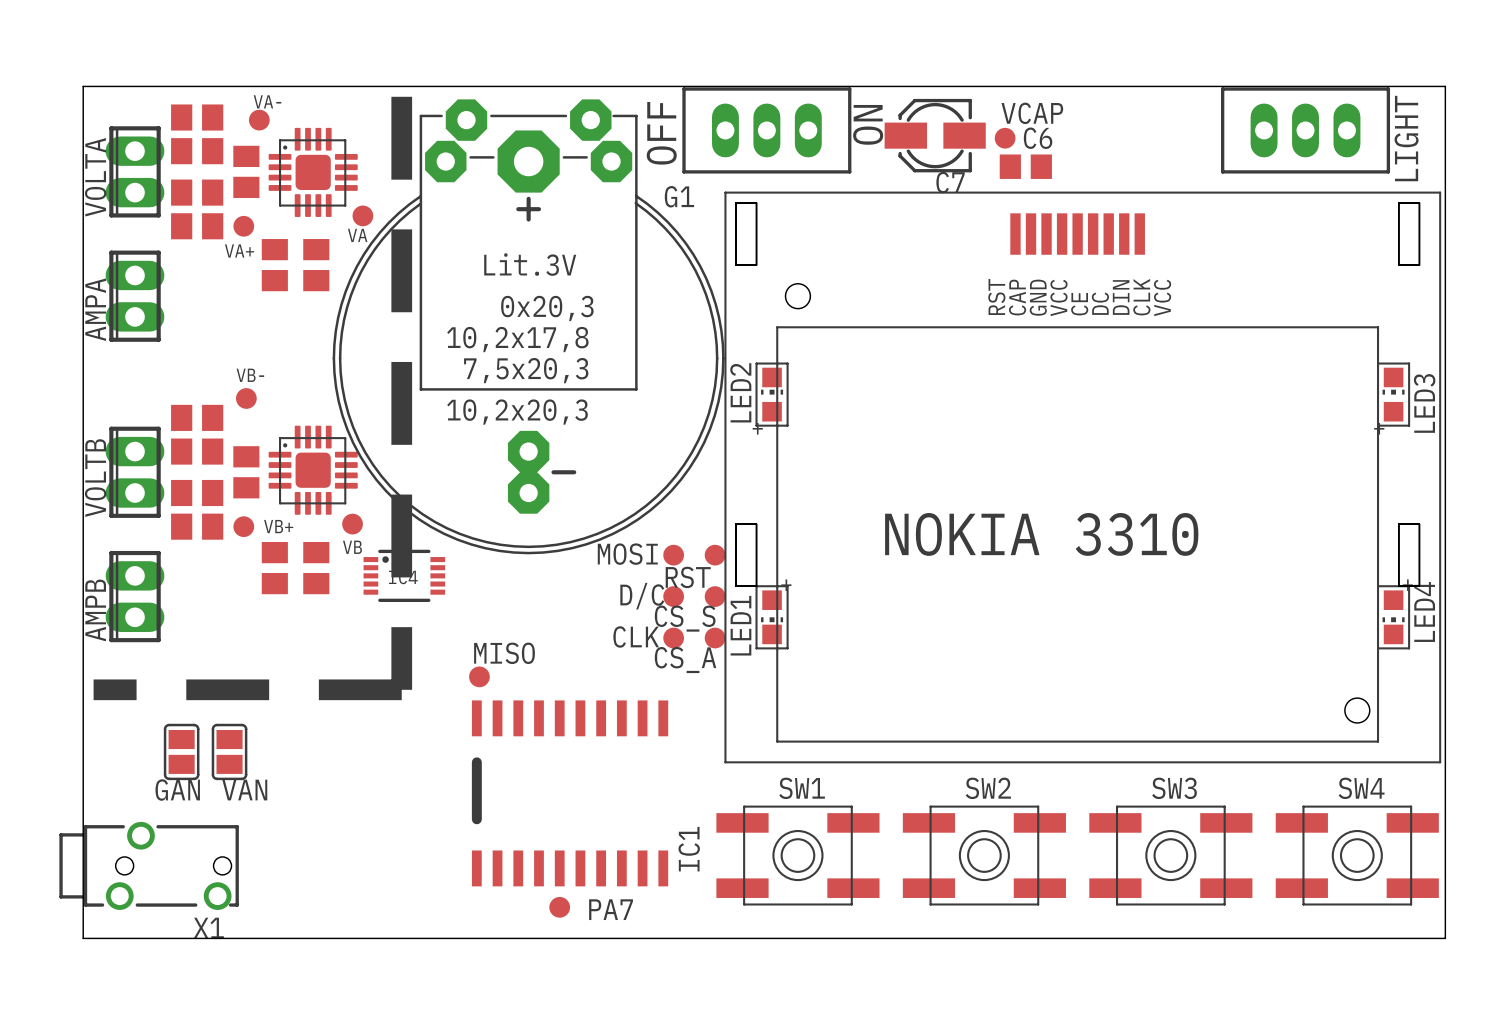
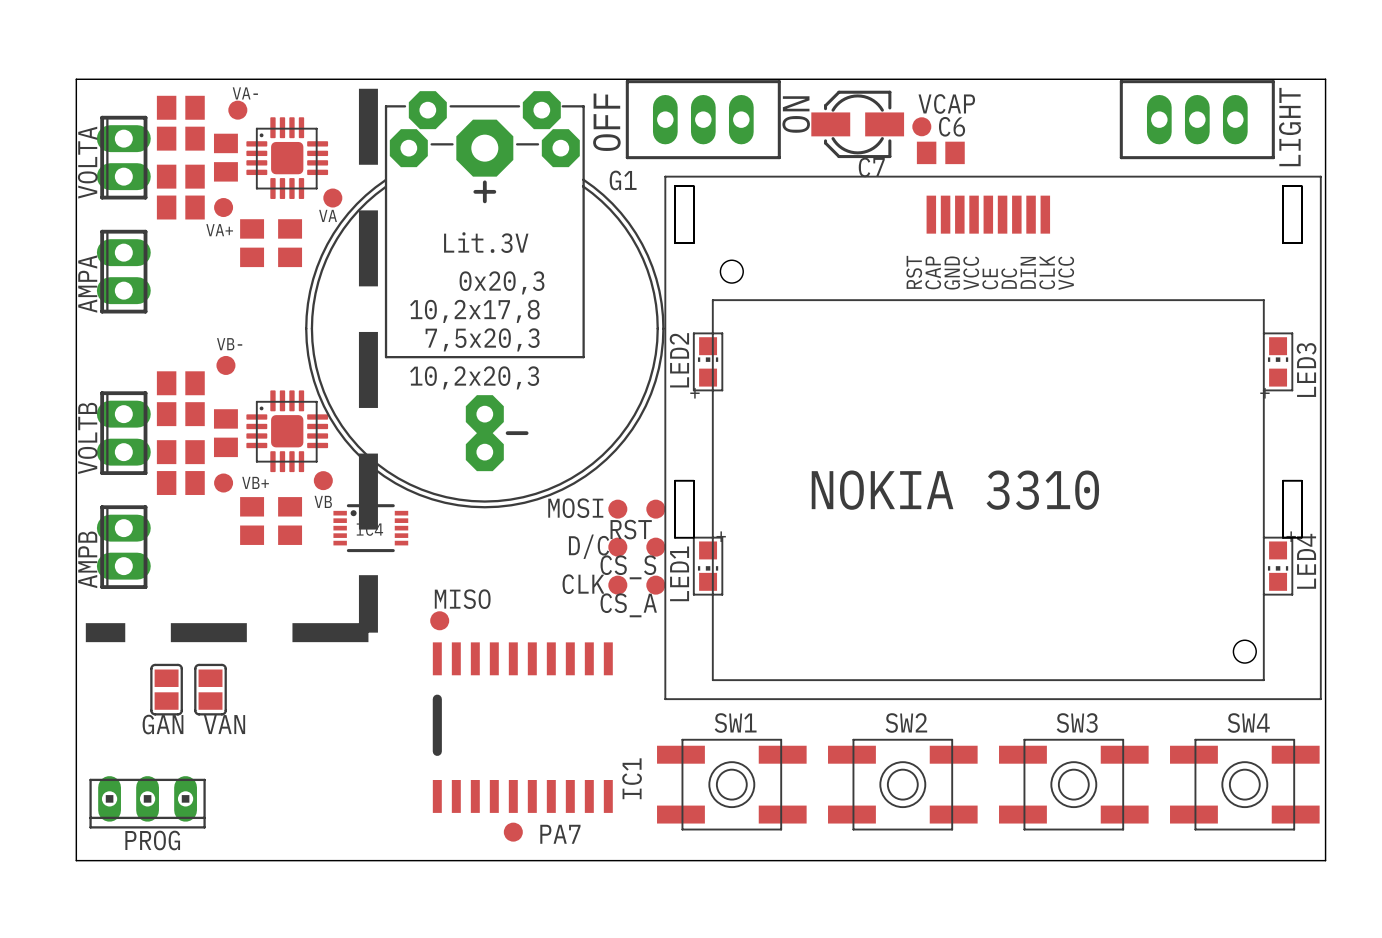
X1: (149, 865) -> none
PROG: none -> (147, 802)

